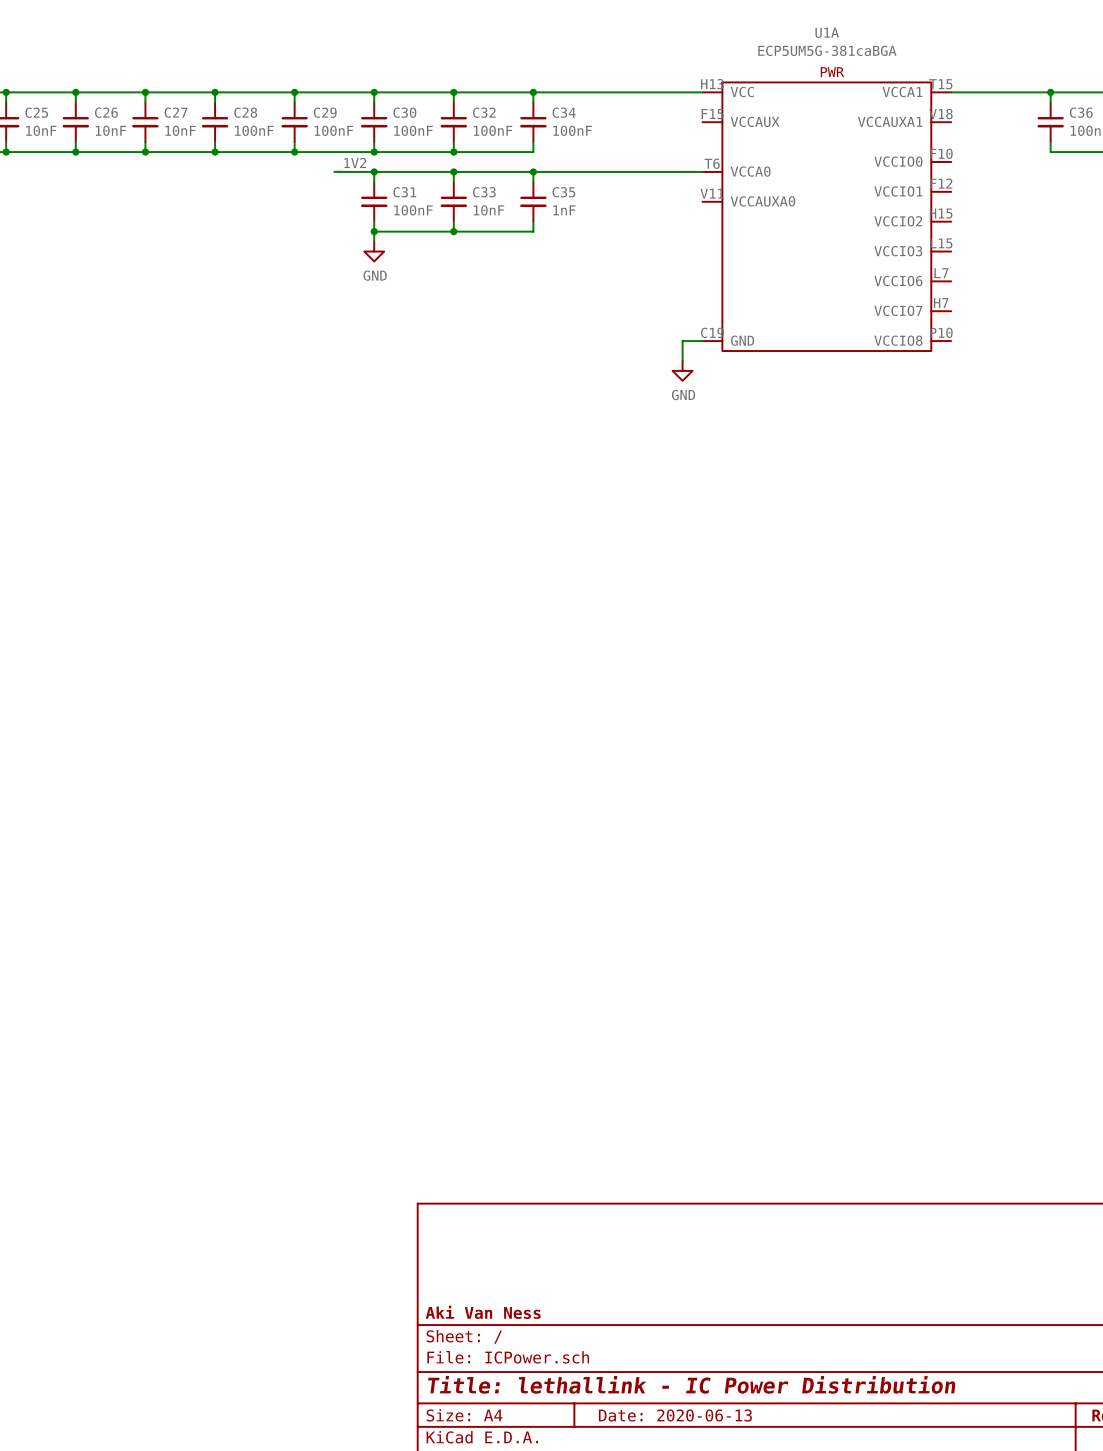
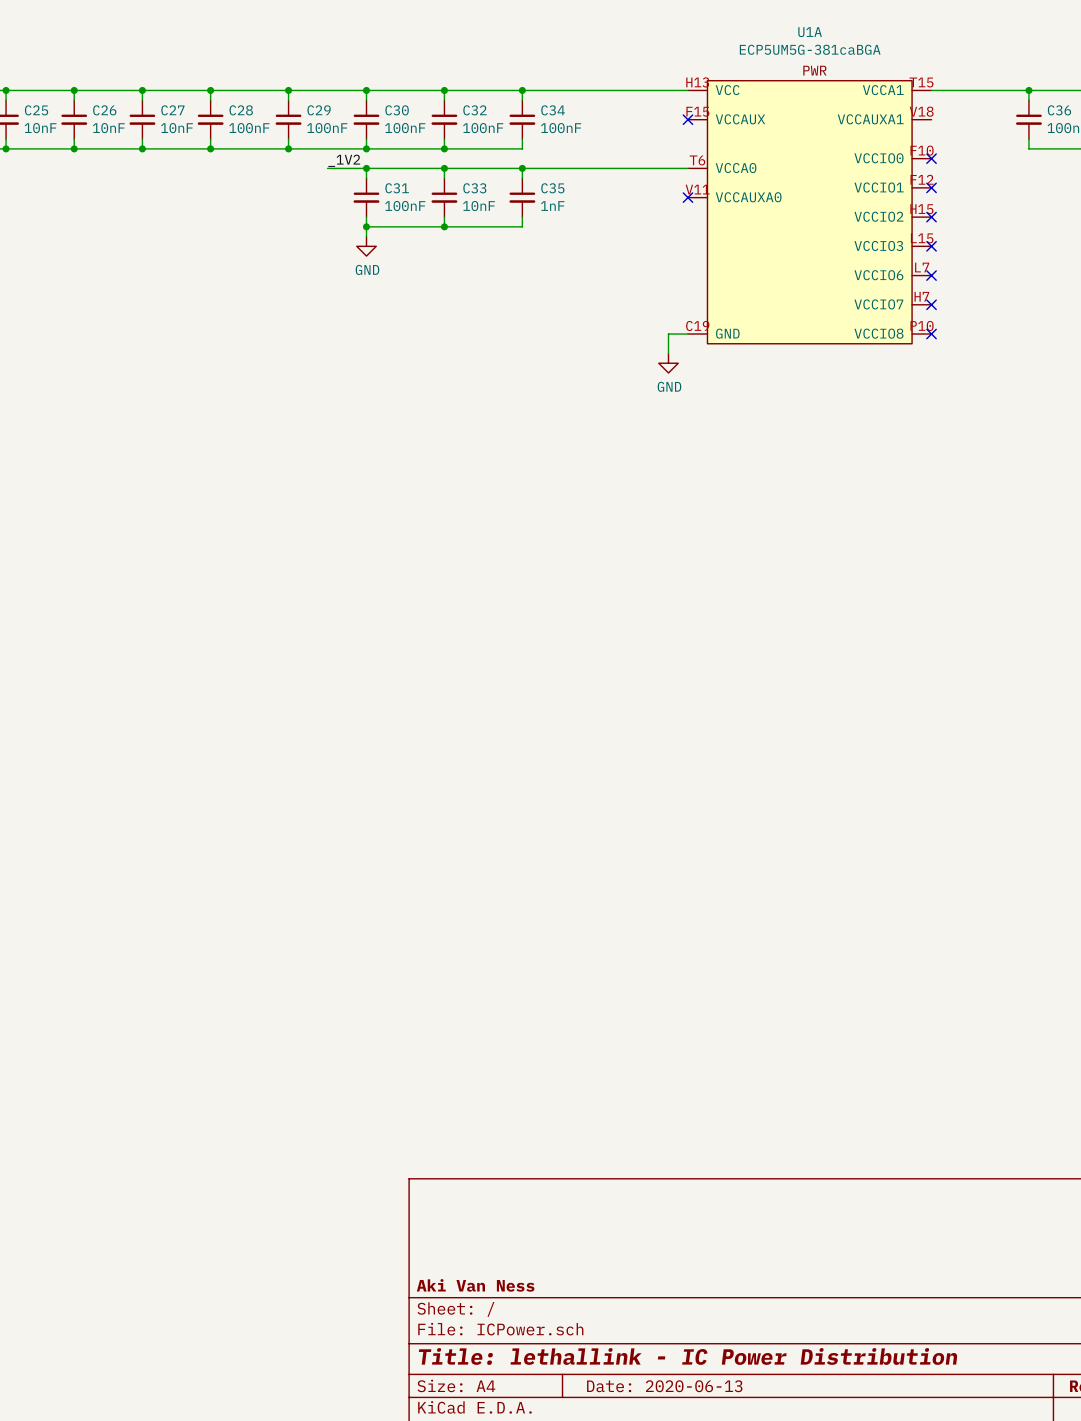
no-connect mark: none -> (687, 119)
no-connect mark: none -> (931, 158)
no-connect mark: none -> (931, 187)
no-connect mark: none -> (687, 197)
no-connect mark: none -> (931, 217)
no-connect mark: none -> (931, 246)
no-connect mark: none -> (931, 275)
no-connect mark: none -> (931, 304)
no-connect mark: none -> (931, 334)

